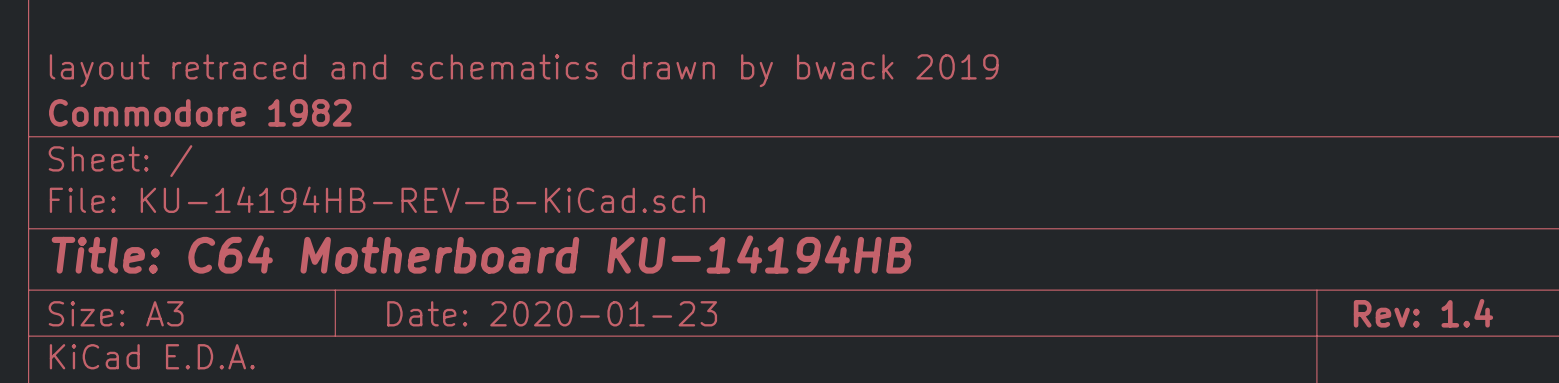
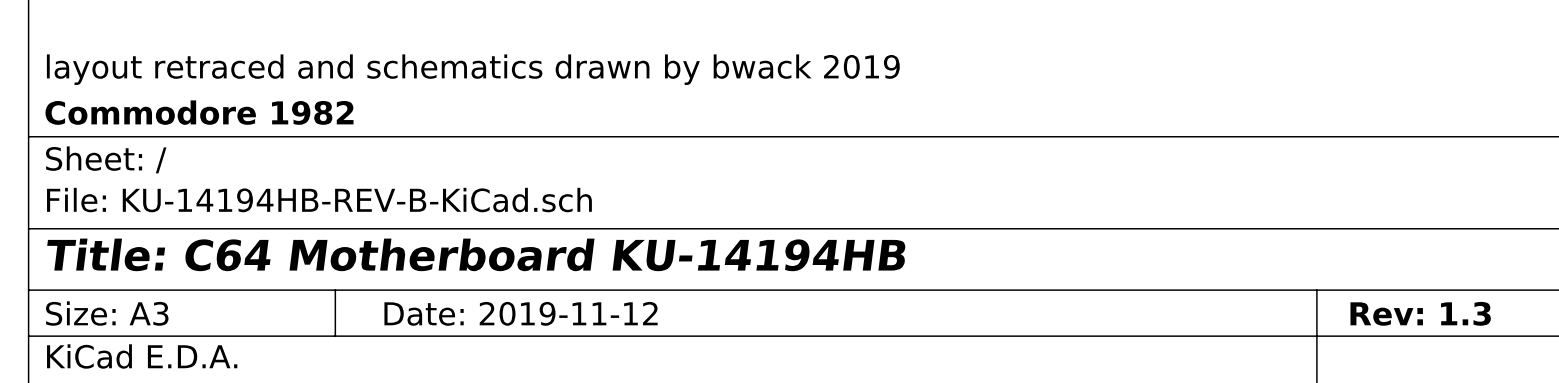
title block: Date: 2020-01-23 (552, 313) -> Date: 2019-11-12 (521, 313)
title block: Rev: 1.4 (1423, 313) -> Rev: 1.3 (1420, 313)

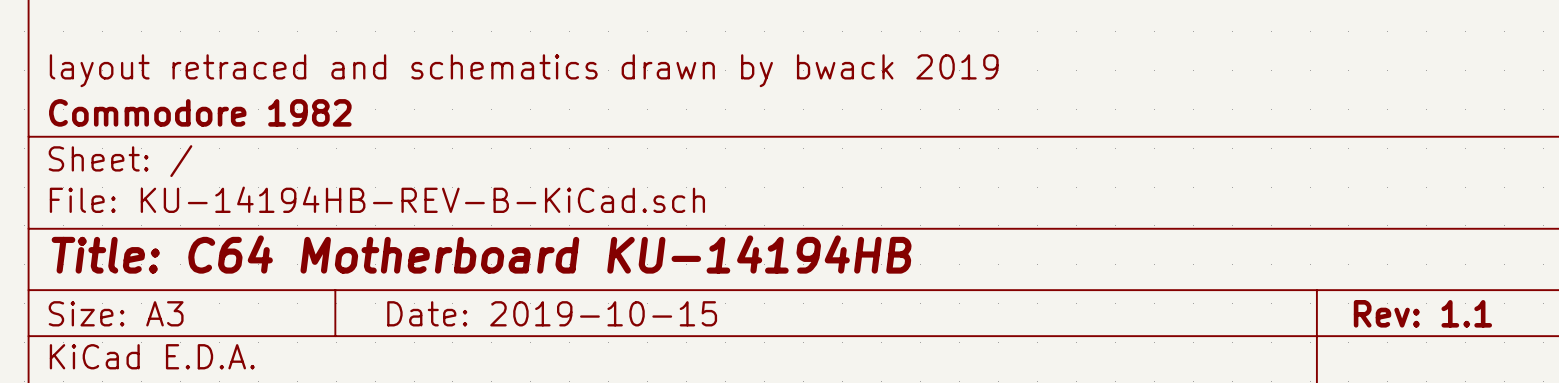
title block: Date: 2019-11-12 (521, 313) -> Date: 2019-10-15 (552, 313)
title block: Rev: 1.3 (1420, 313) -> Rev: 1.1 (1422, 313)

